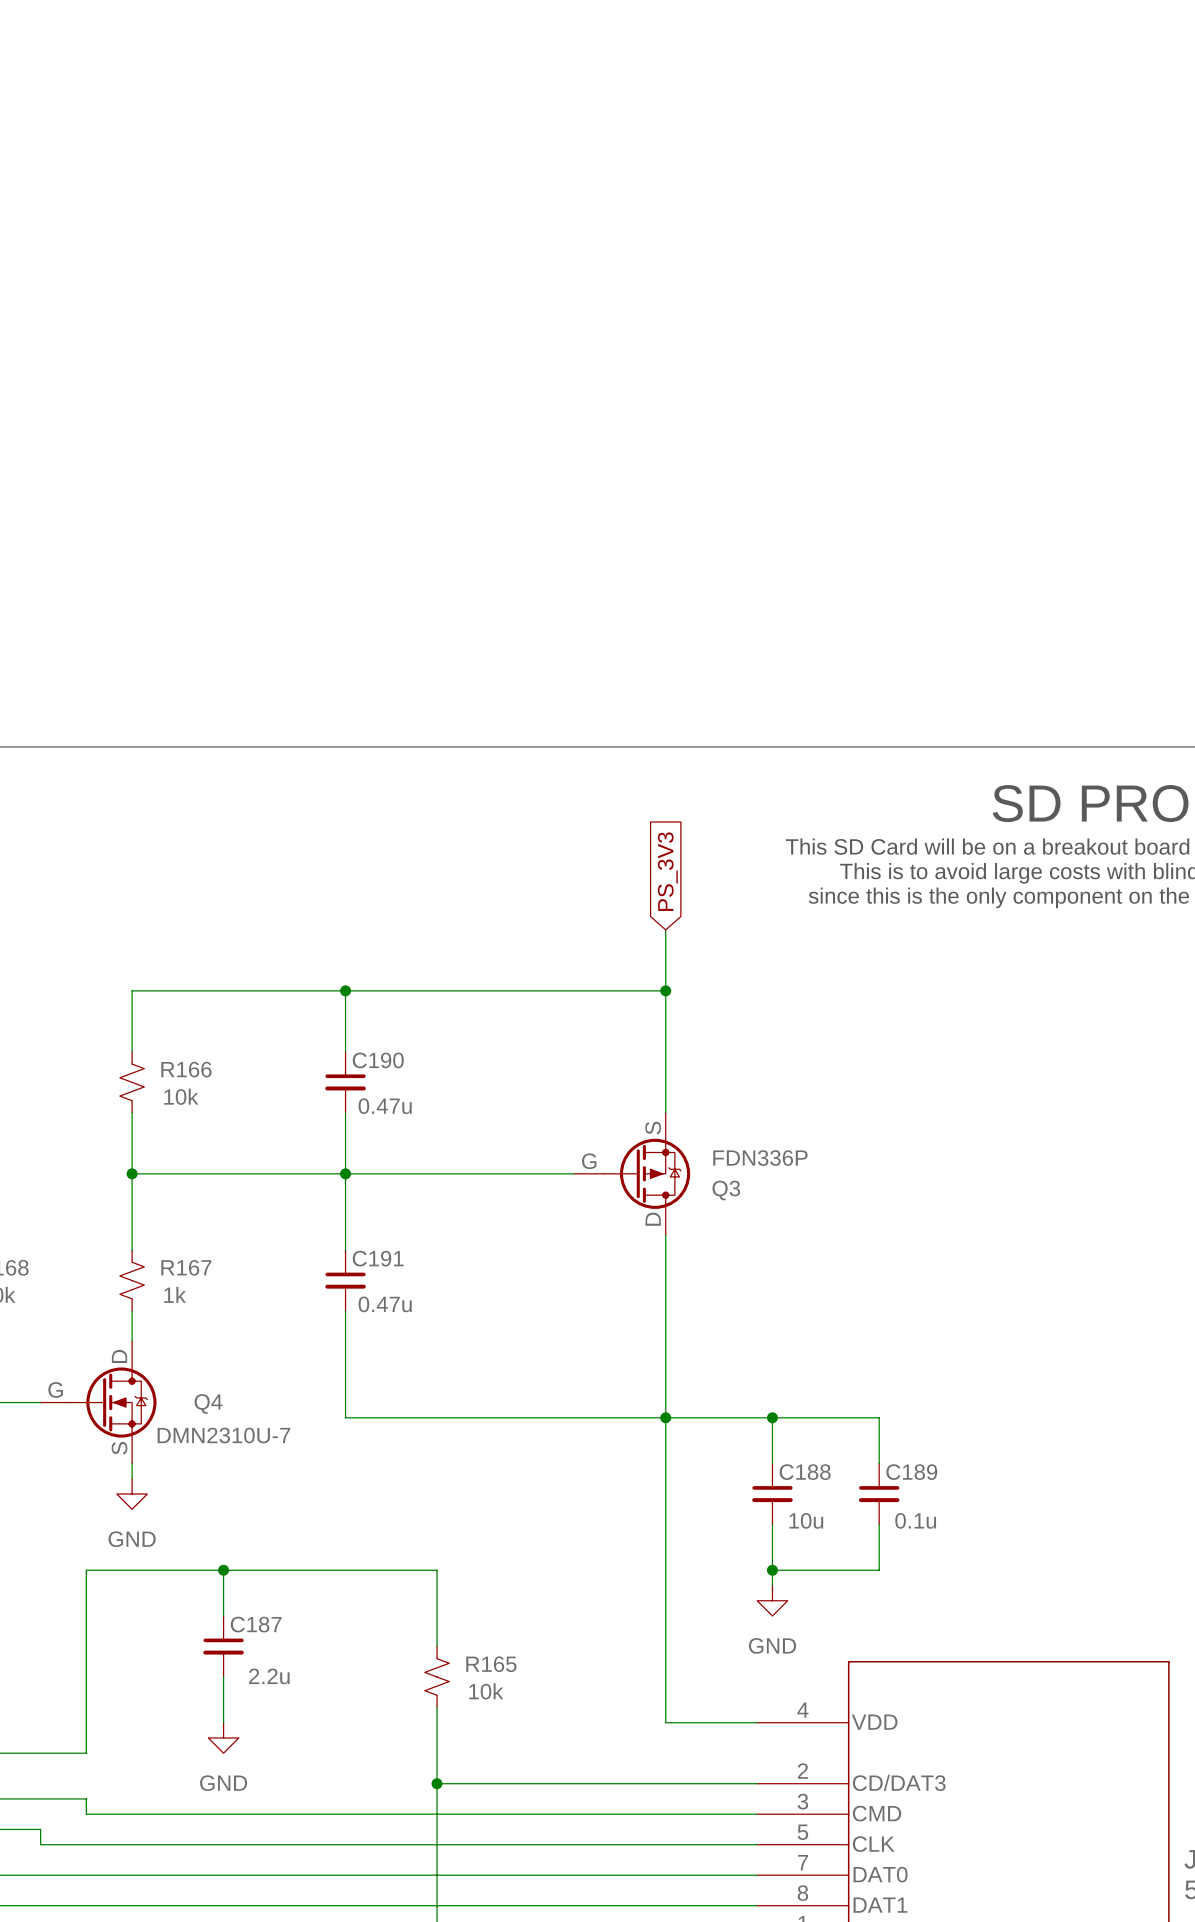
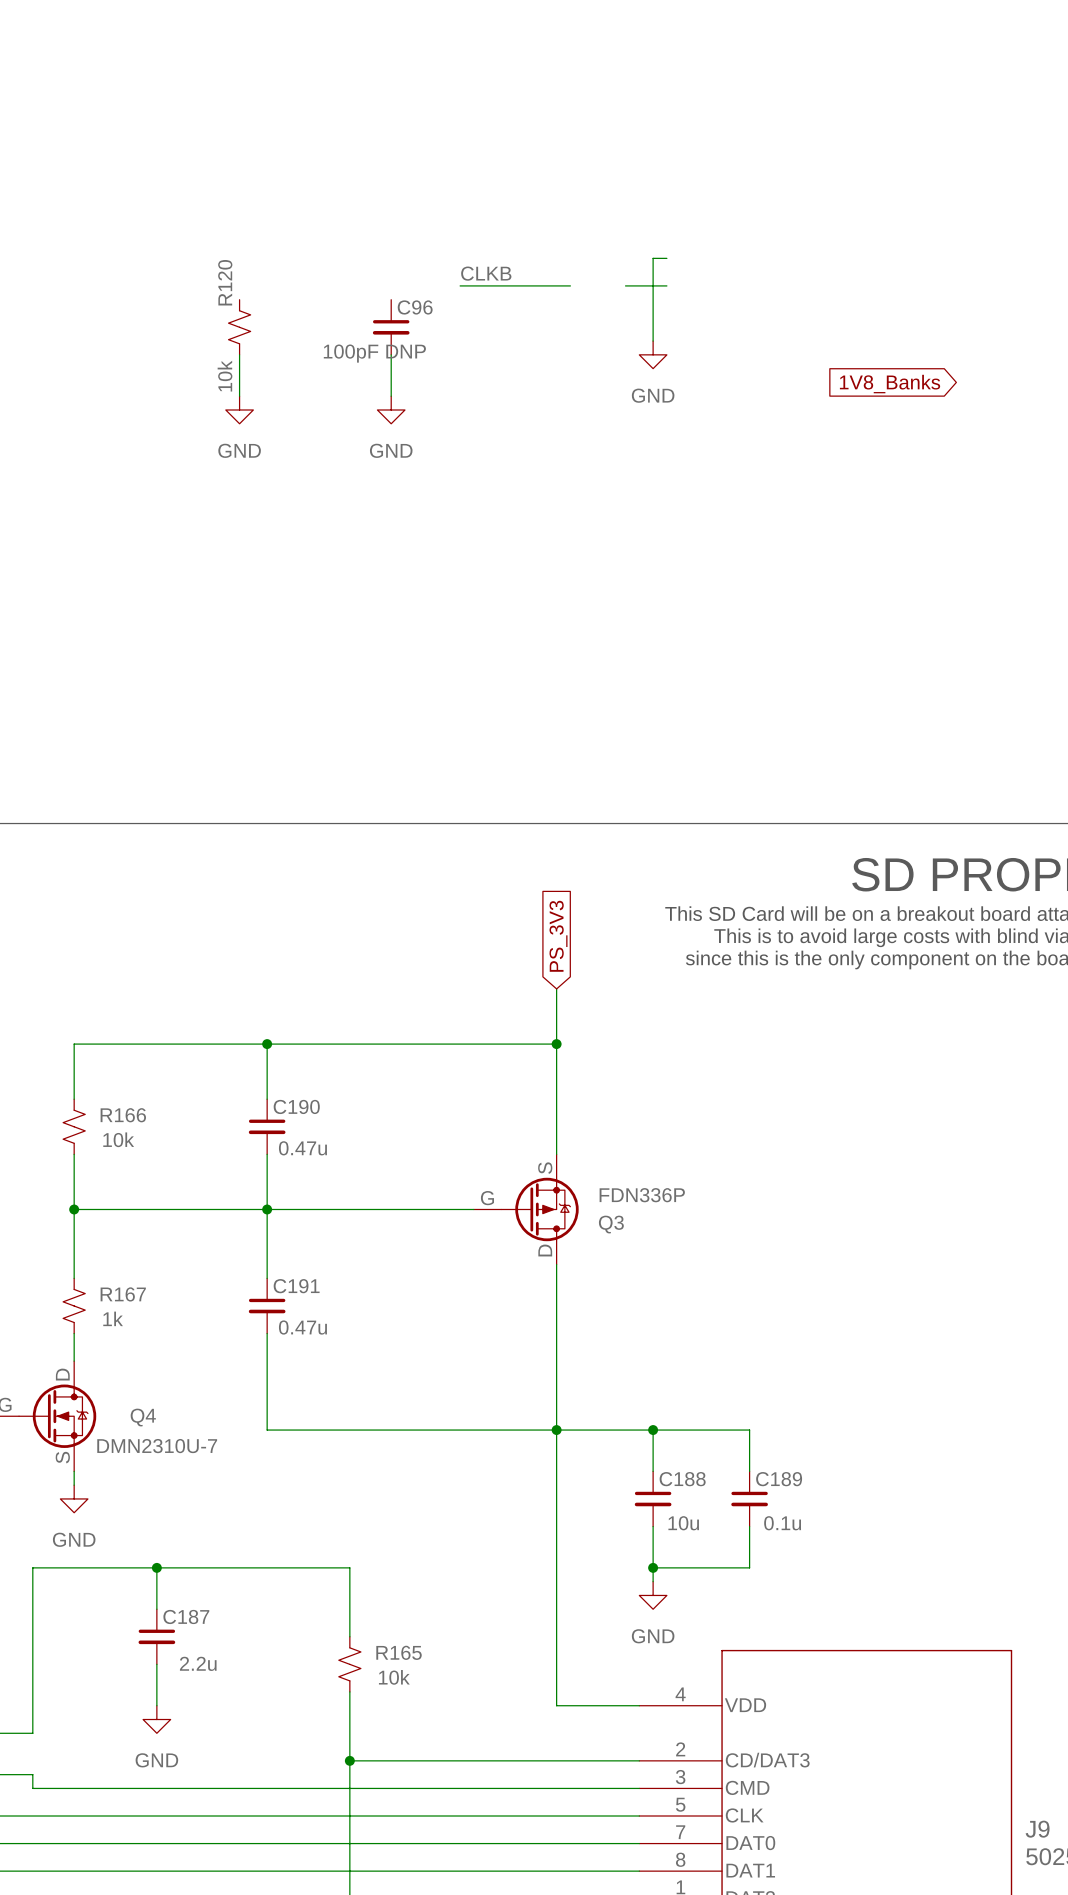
wire: none -> (666, 258) (653, 258) (653, 341)
label: none -> CLKB (486, 273)
wire: none -> (460, 285) (570, 285)
wire: none -> (625, 285) (666, 285)
R120: none -> 10k (239, 327)
C96: none -> 100pF DNP (391, 327)
wire: none -> (239, 354) (239, 396)
wire: none -> (391, 354) (391, 396)
power symbol: none -> GND (653, 354)
global label: none -> 1V8_Banks (890, 384)
power symbol: none -> GND (239, 409)
power symbol: none -> GND (391, 409)

